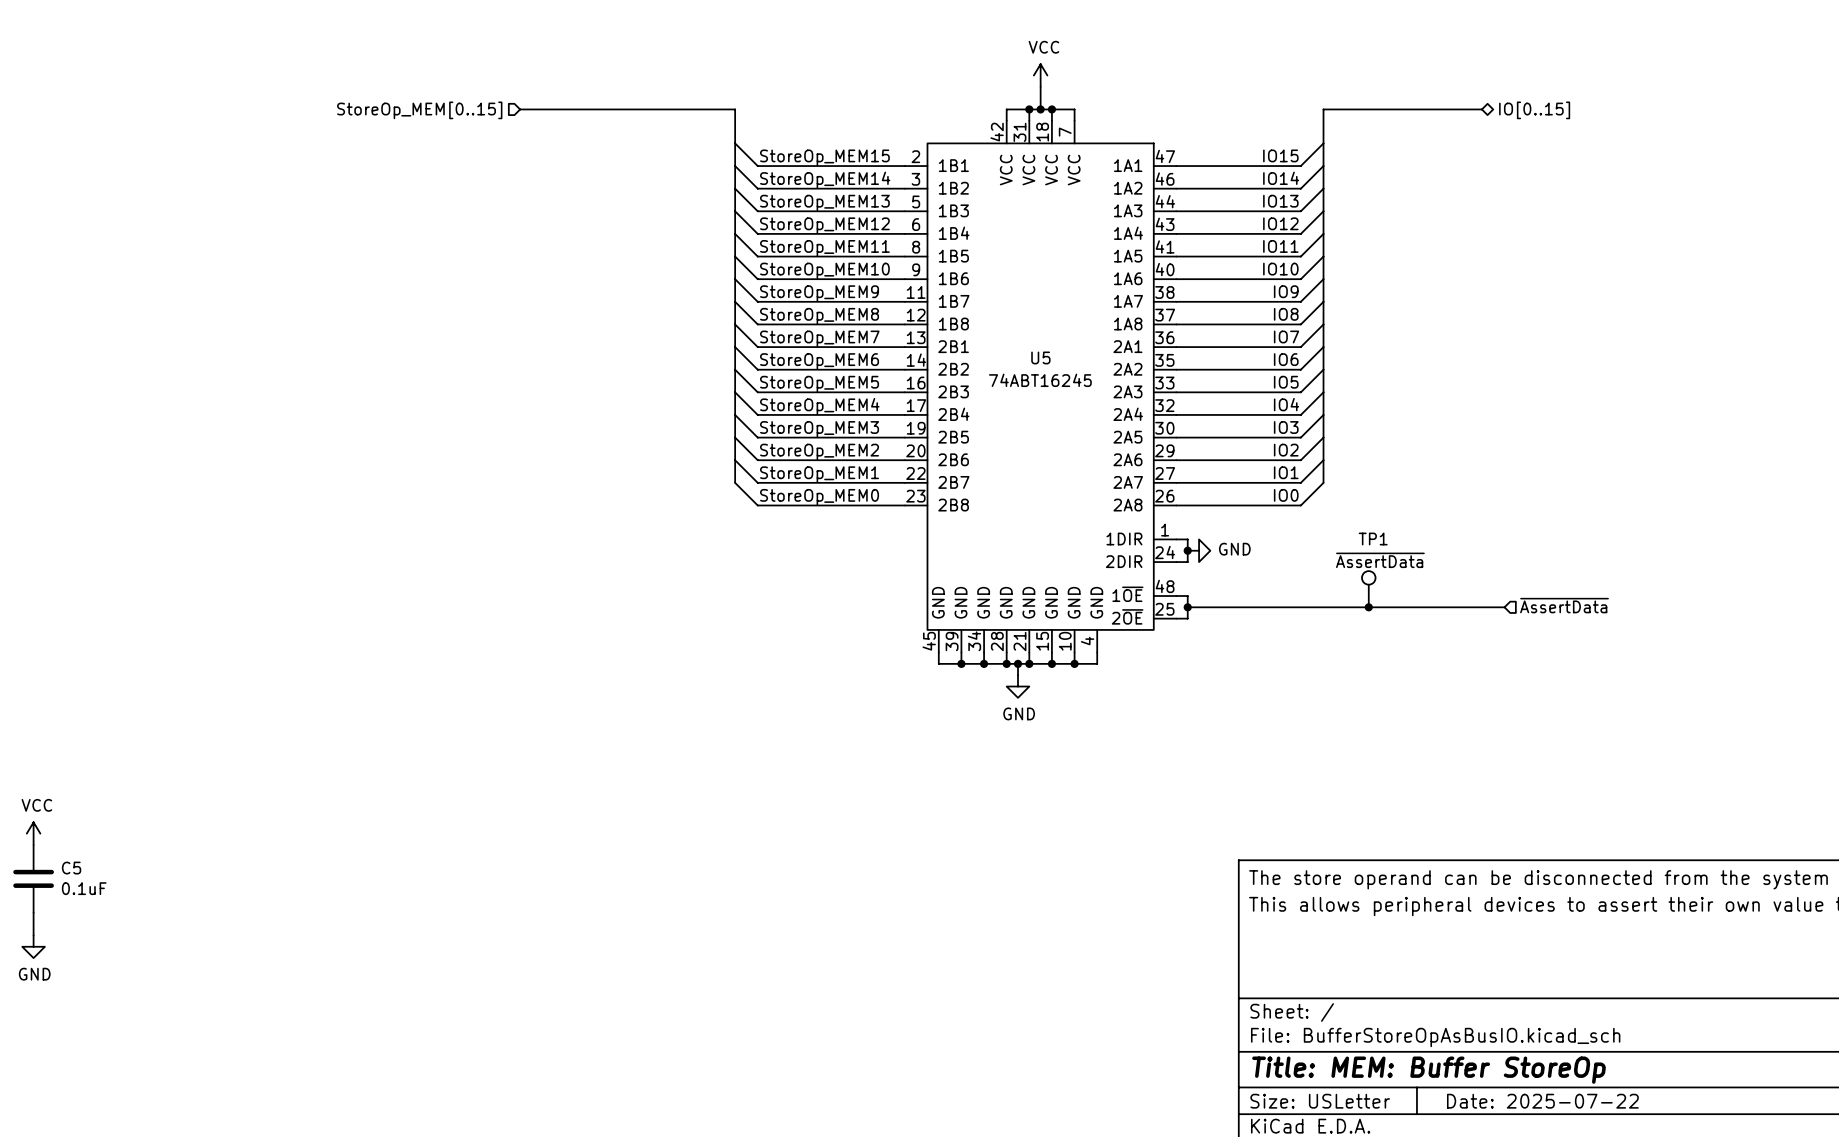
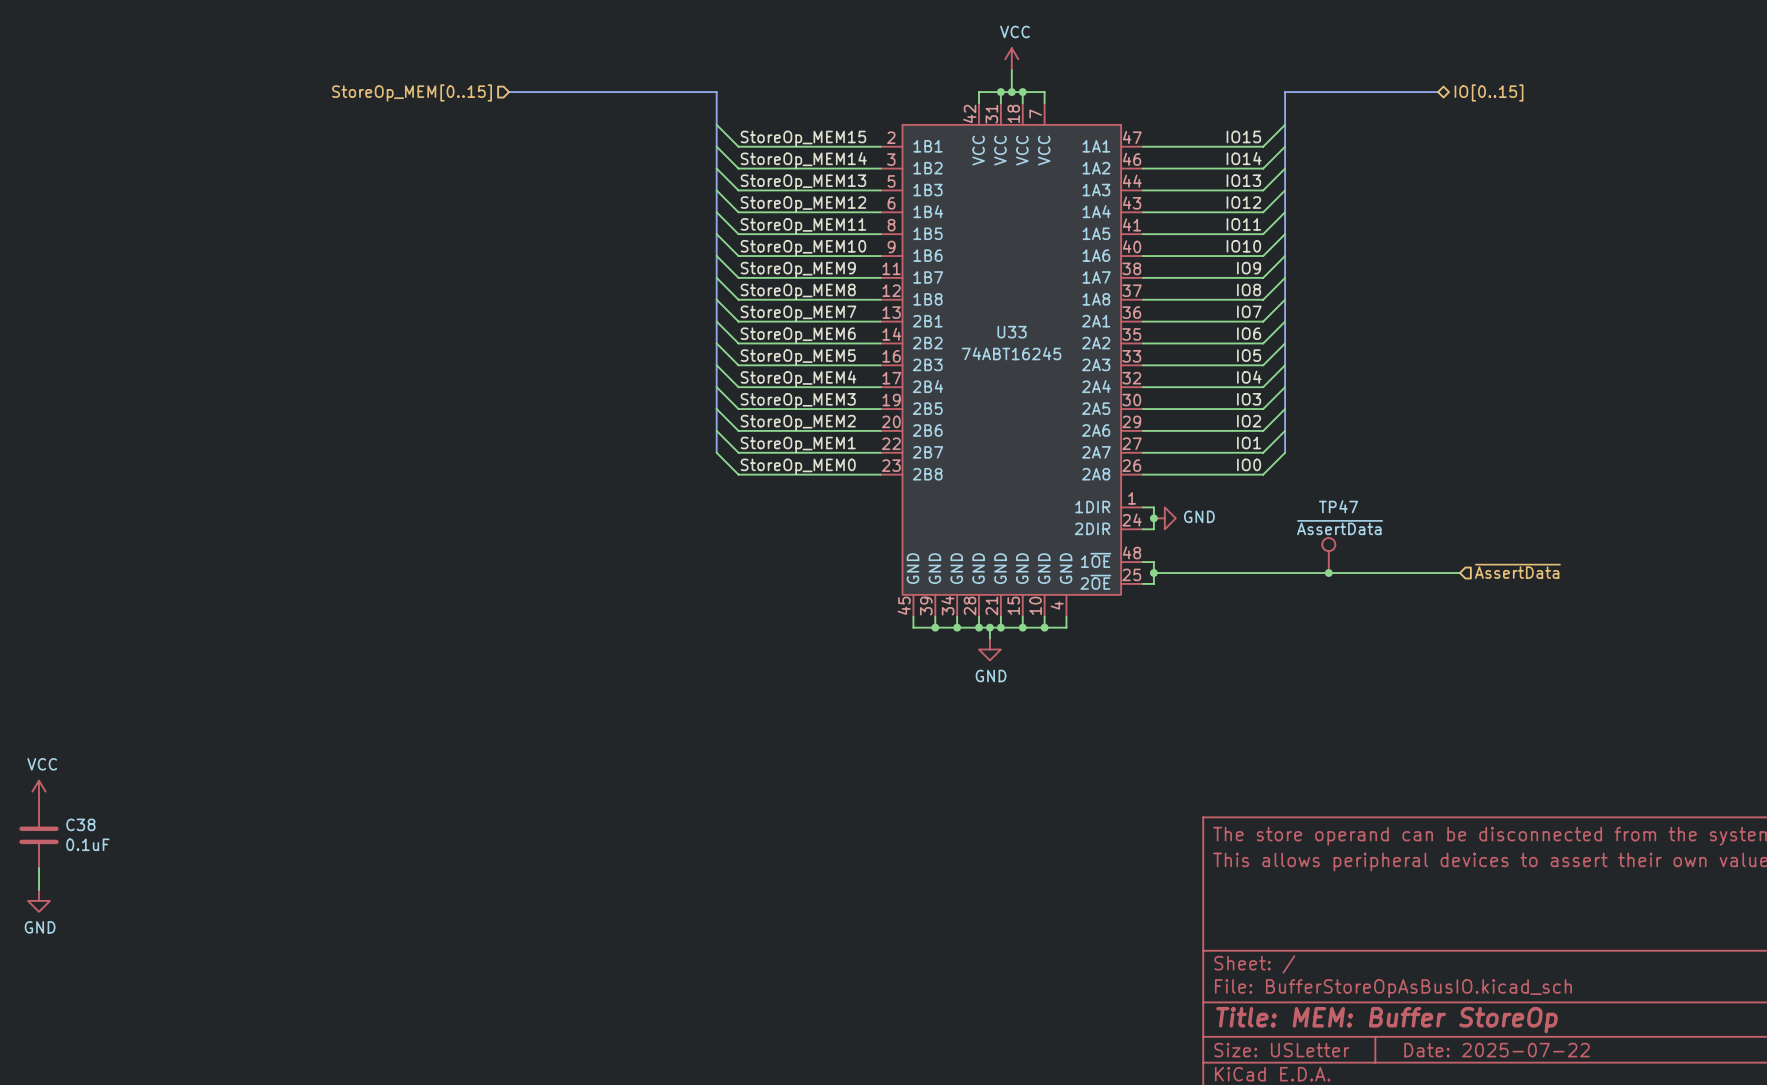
U5 name: U5 (1040, 357) -> U33 (1012, 332)
TP1 name: TP1 (1373, 539) -> TP47 (1338, 506)
C5 name: C5 (71, 868) -> C38 (80, 824)

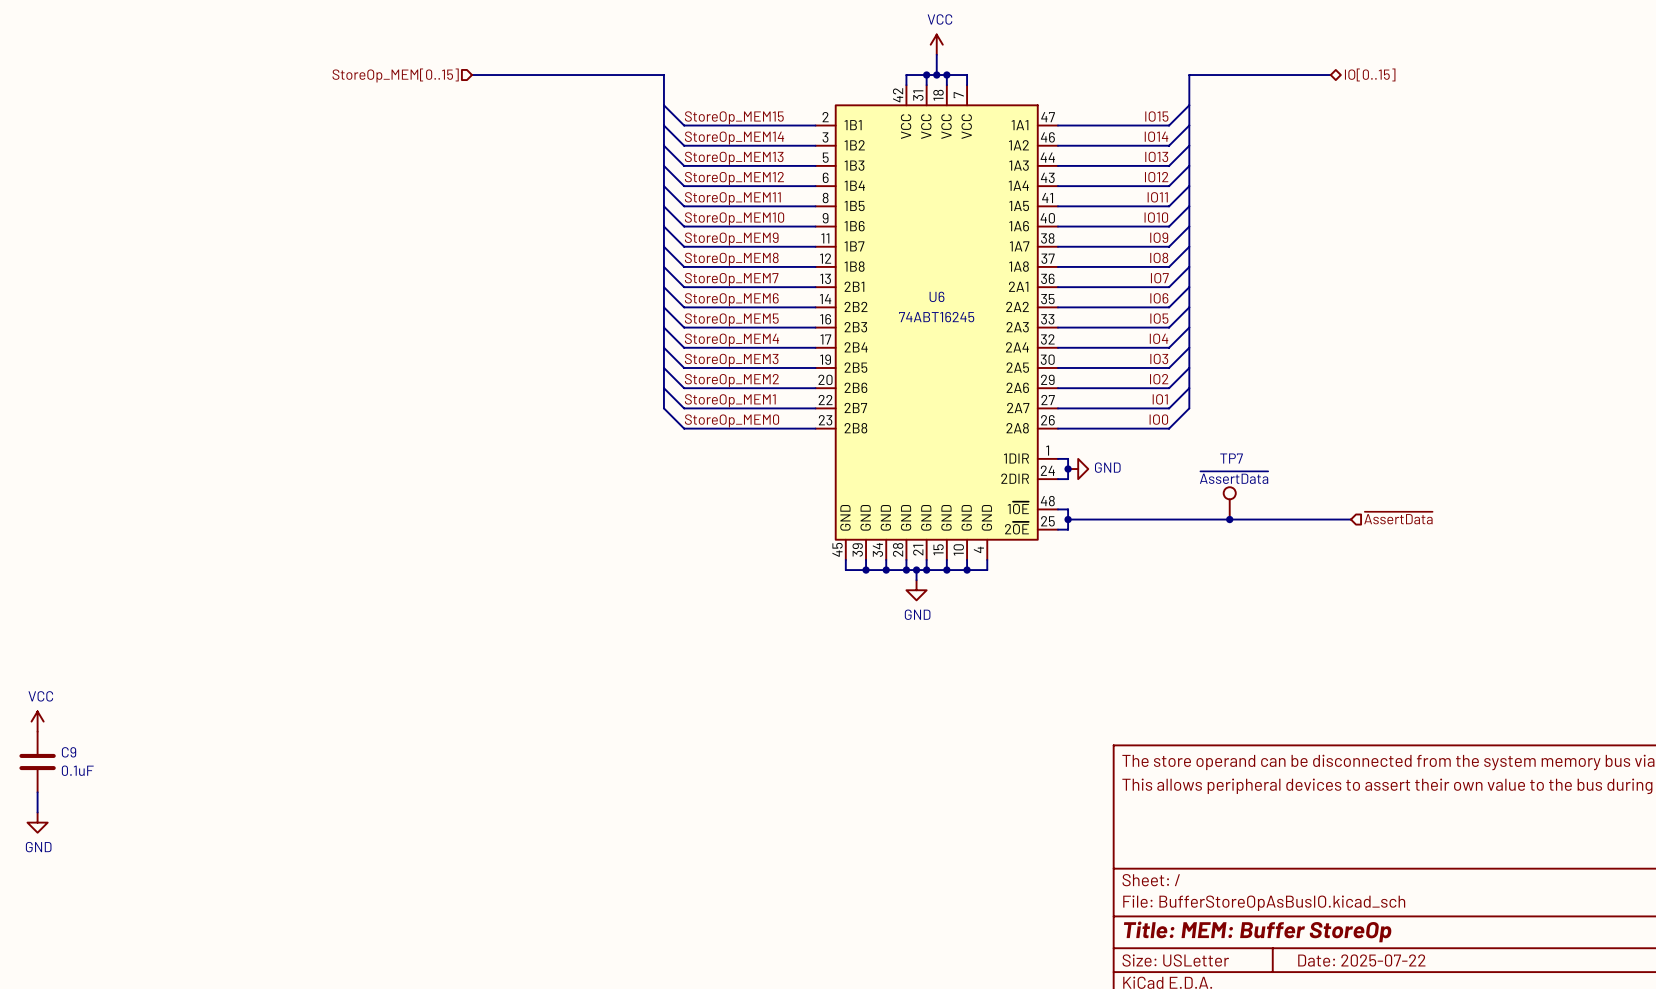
U33 name: U33 (1012, 332) -> U6 (937, 296)
TP47 name: TP47 (1338, 506) -> TP7 (1231, 458)
C38 name: C38 (80, 824) -> C9 (69, 752)

